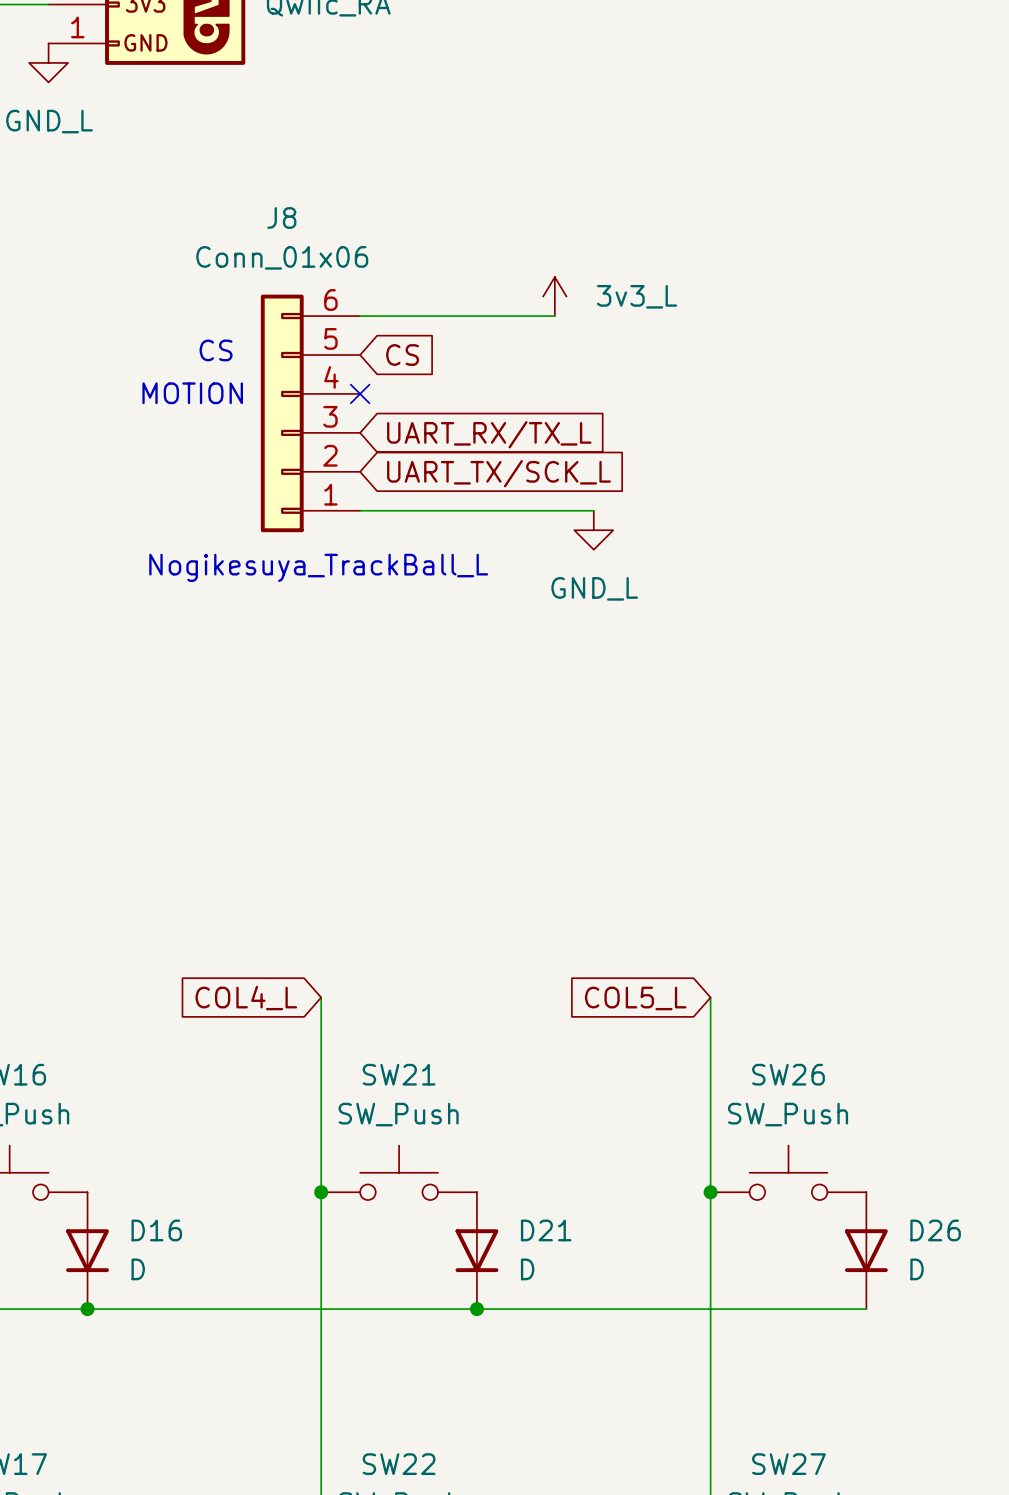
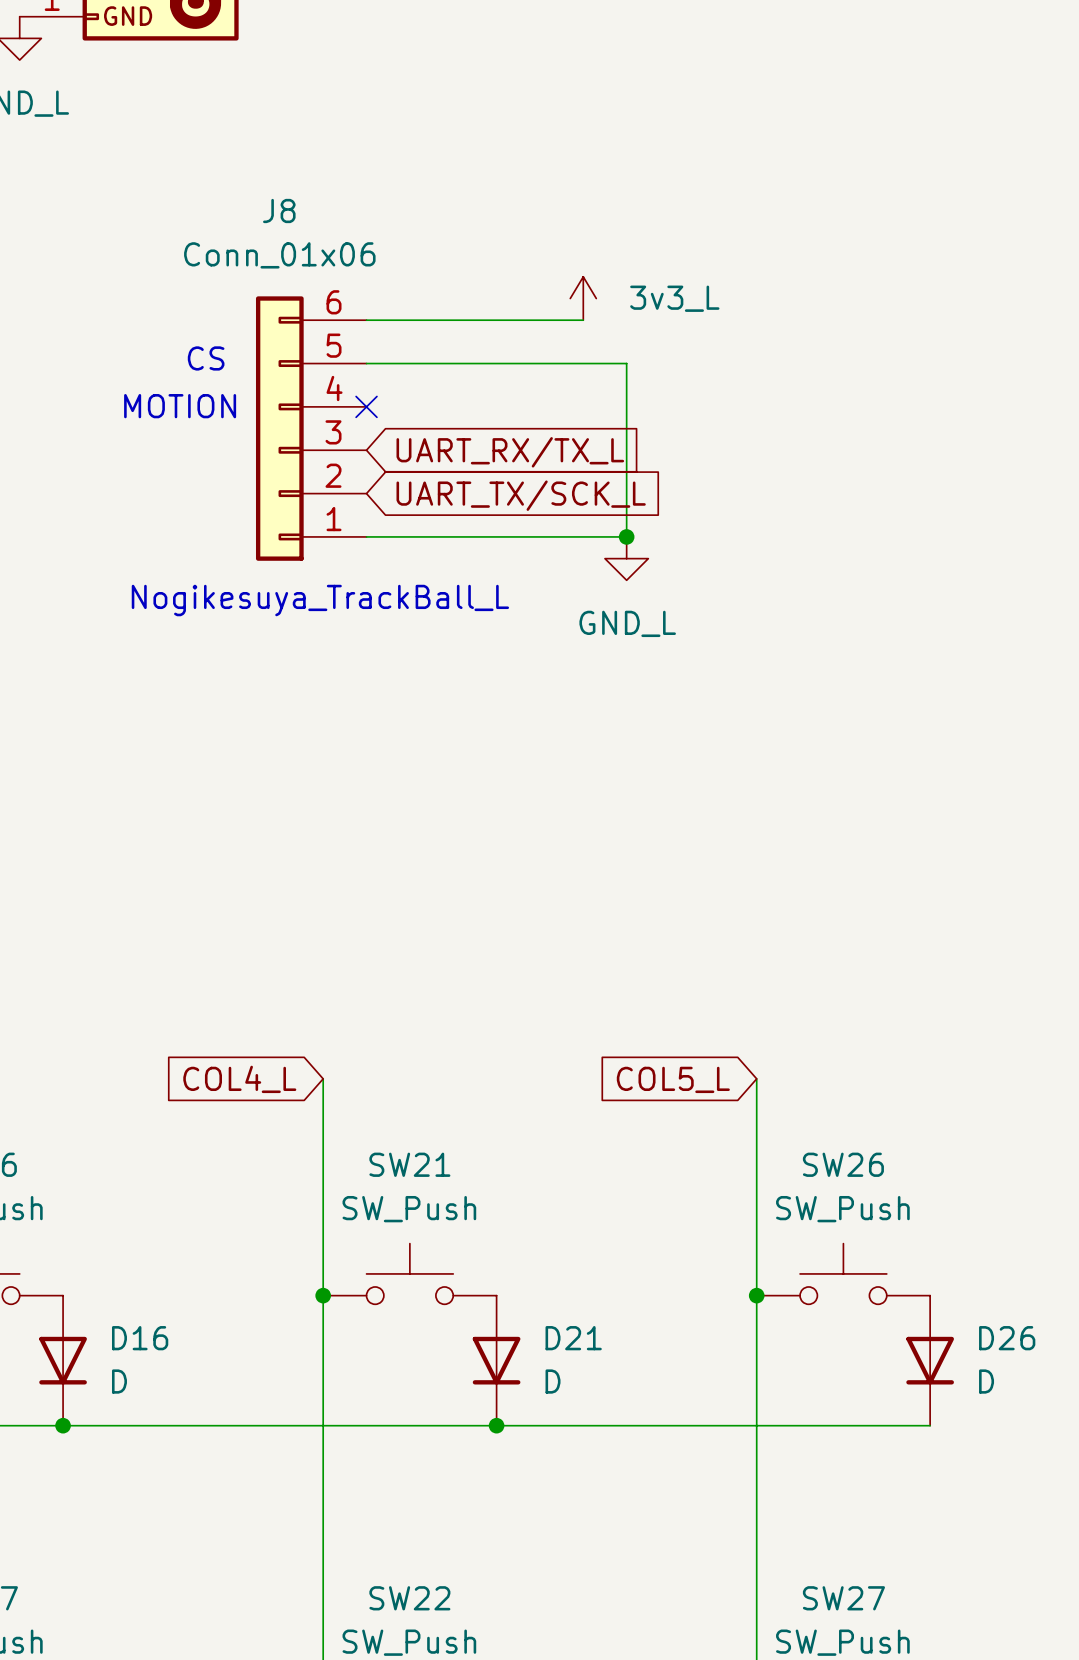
wire: none -> (366, 363) (626, 363) (626, 536)
global label: CS (402, 355) -> none
junction: none -> (626, 536)

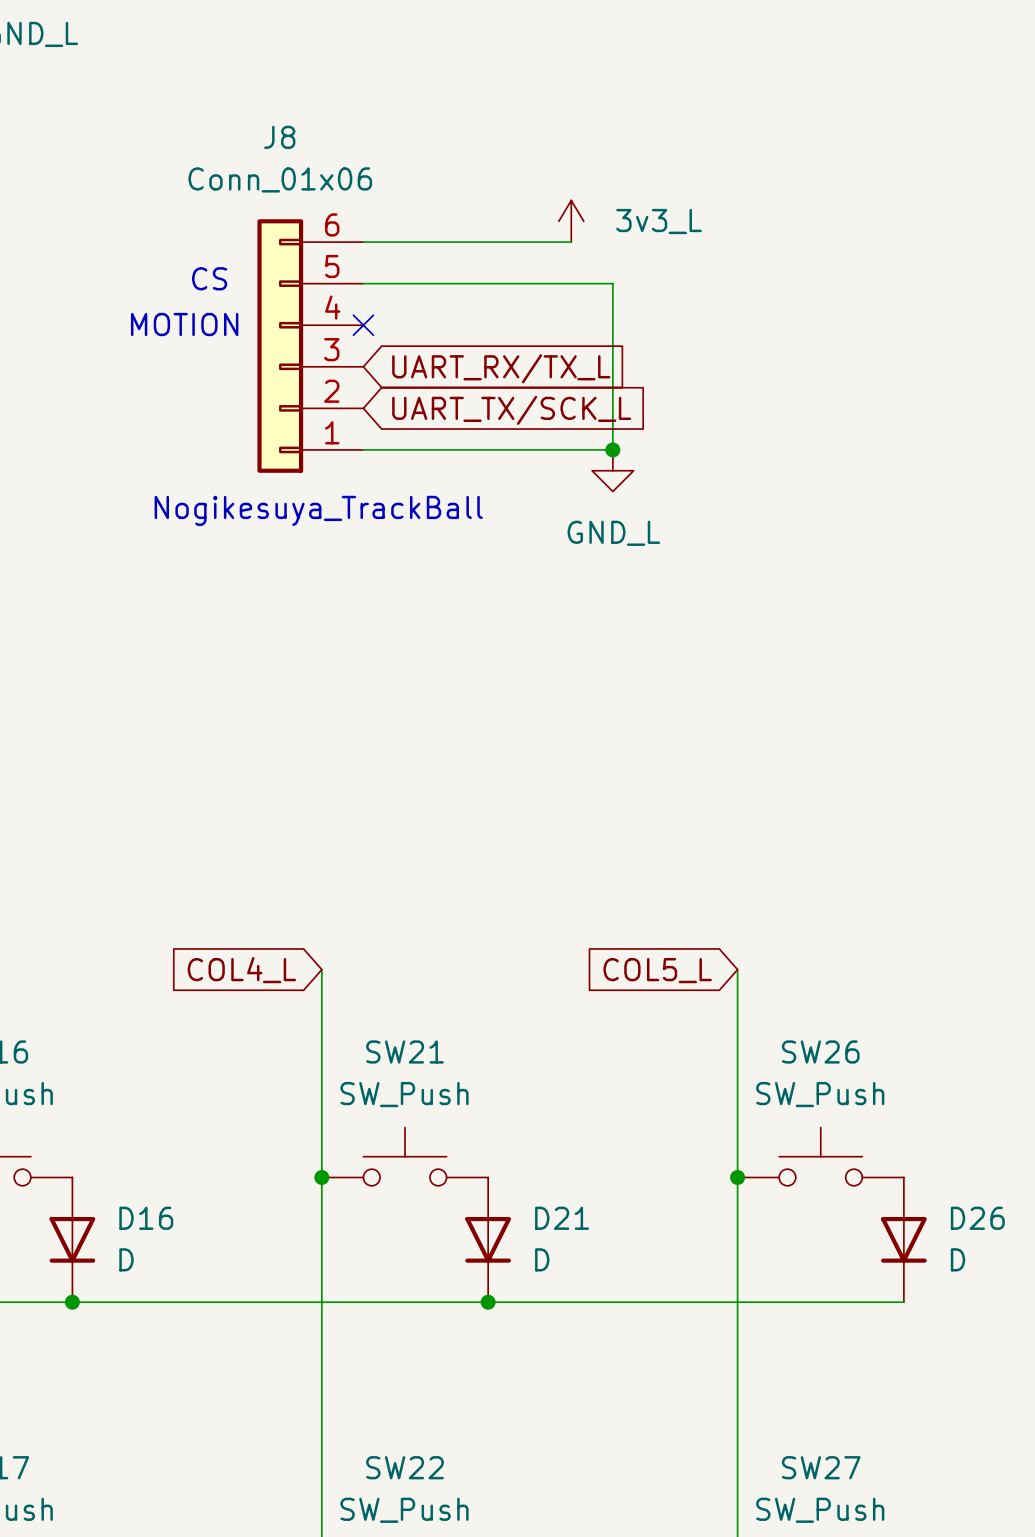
text: Nogikesuya_TrackBall_L (320, 600) -> Nogikesuya_TrackBall (318, 510)

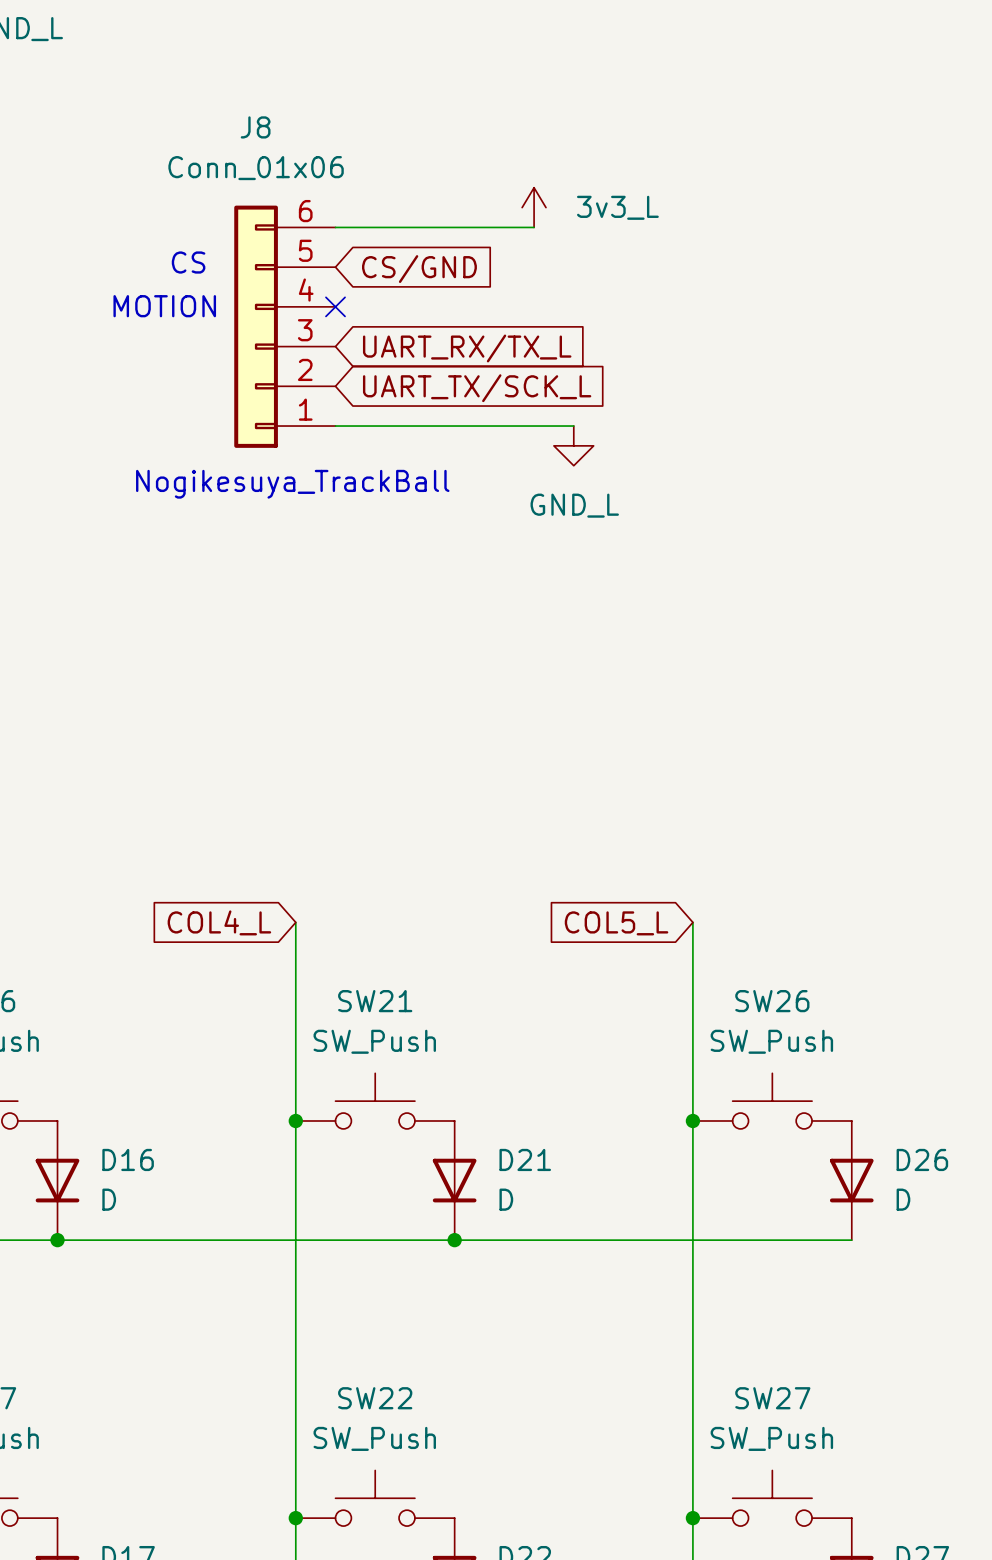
wire: (363, 283) (612, 283) (612, 449) -> none
global label: none -> CS/GND (419, 269)
junction: (612, 449) -> none

